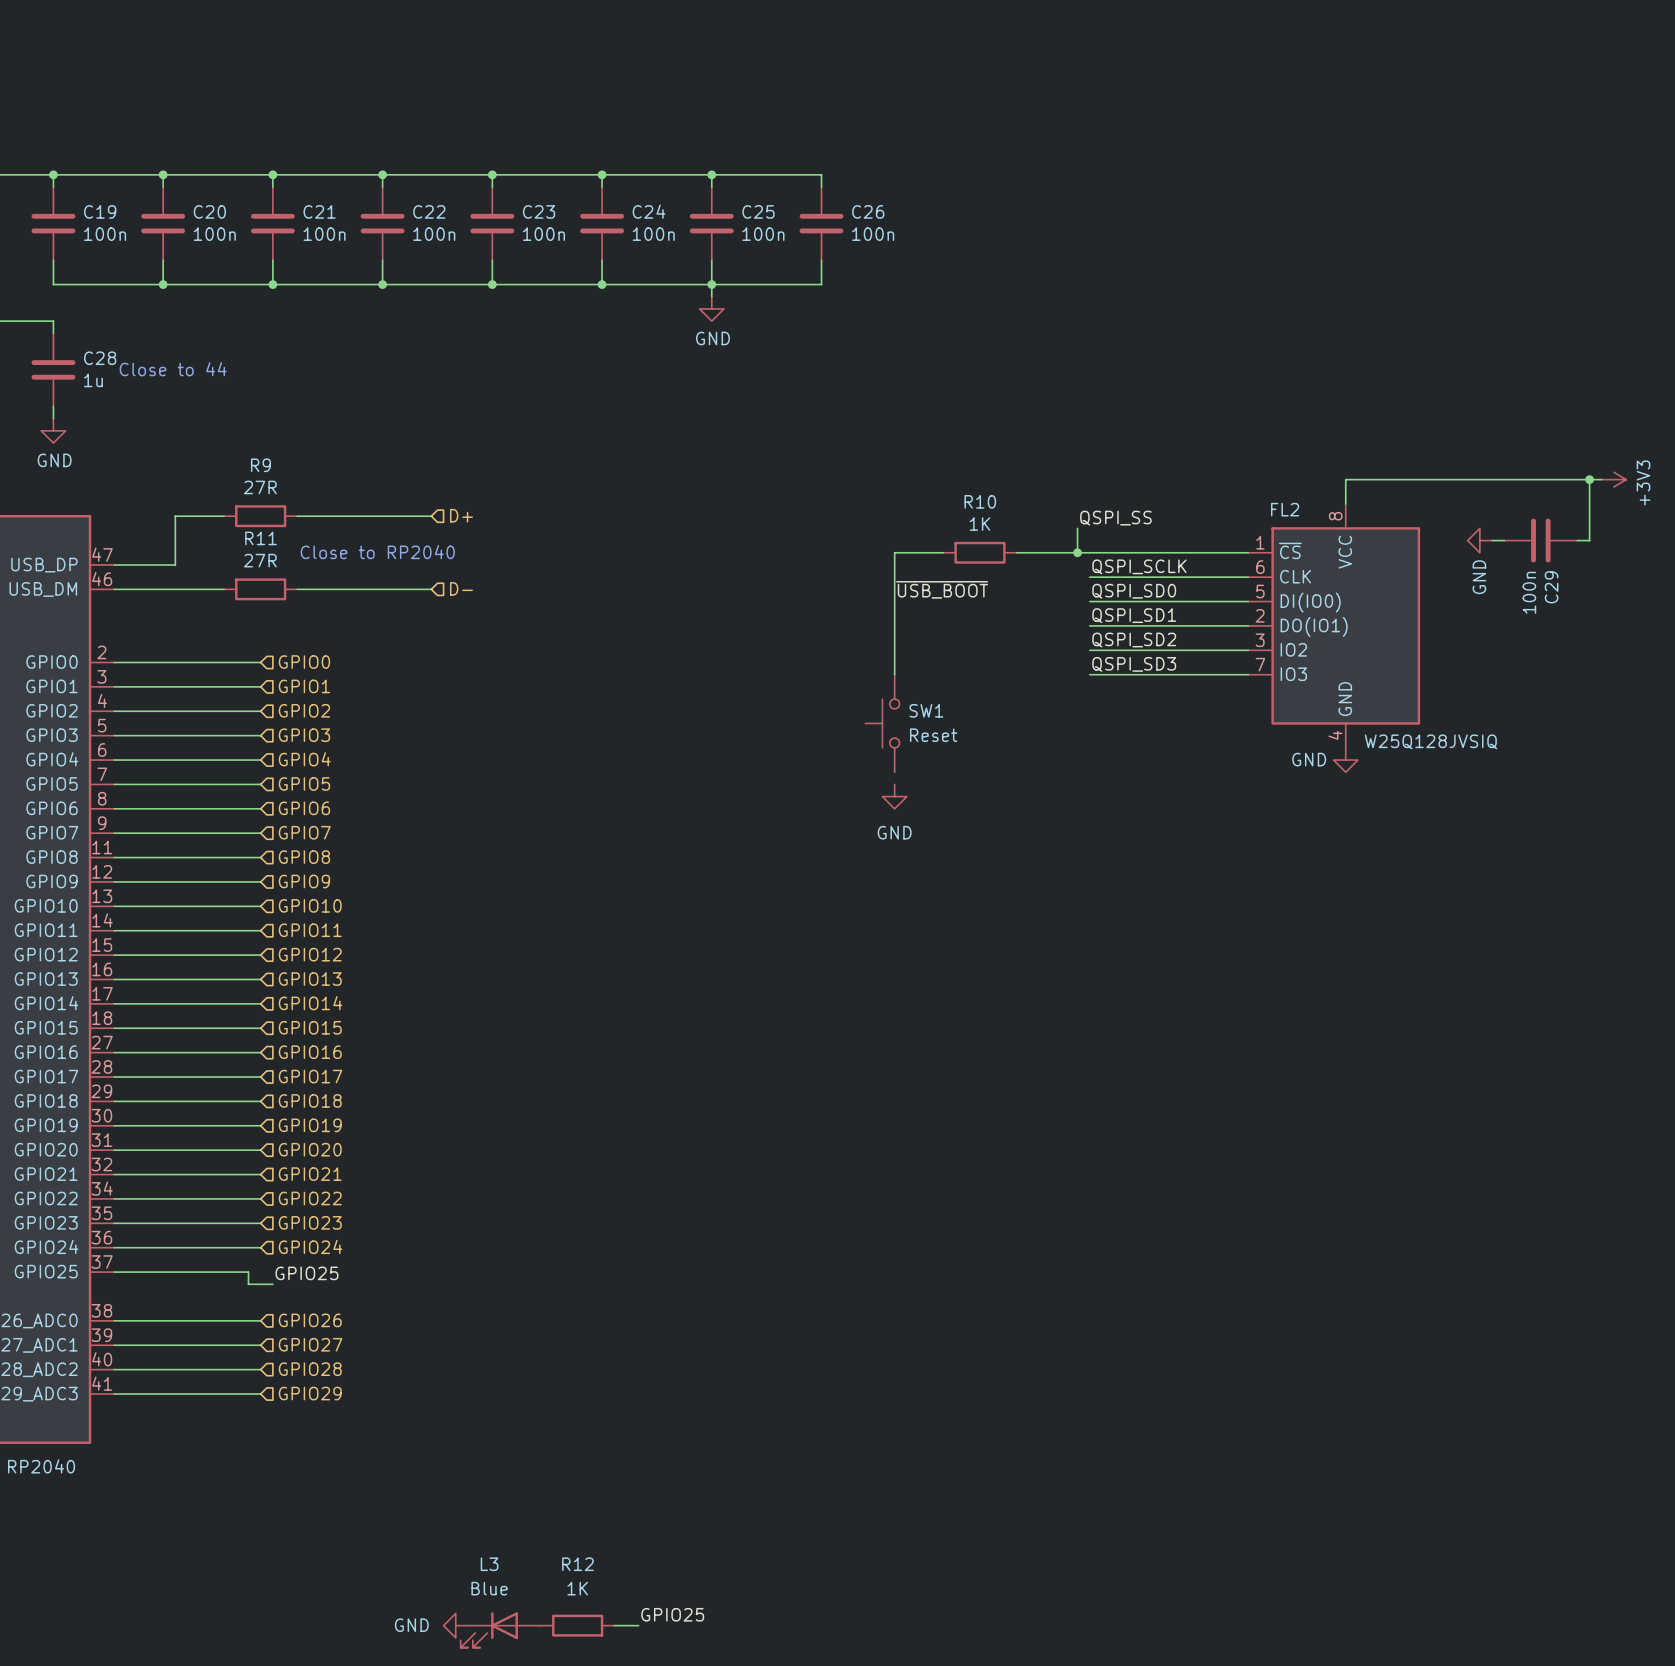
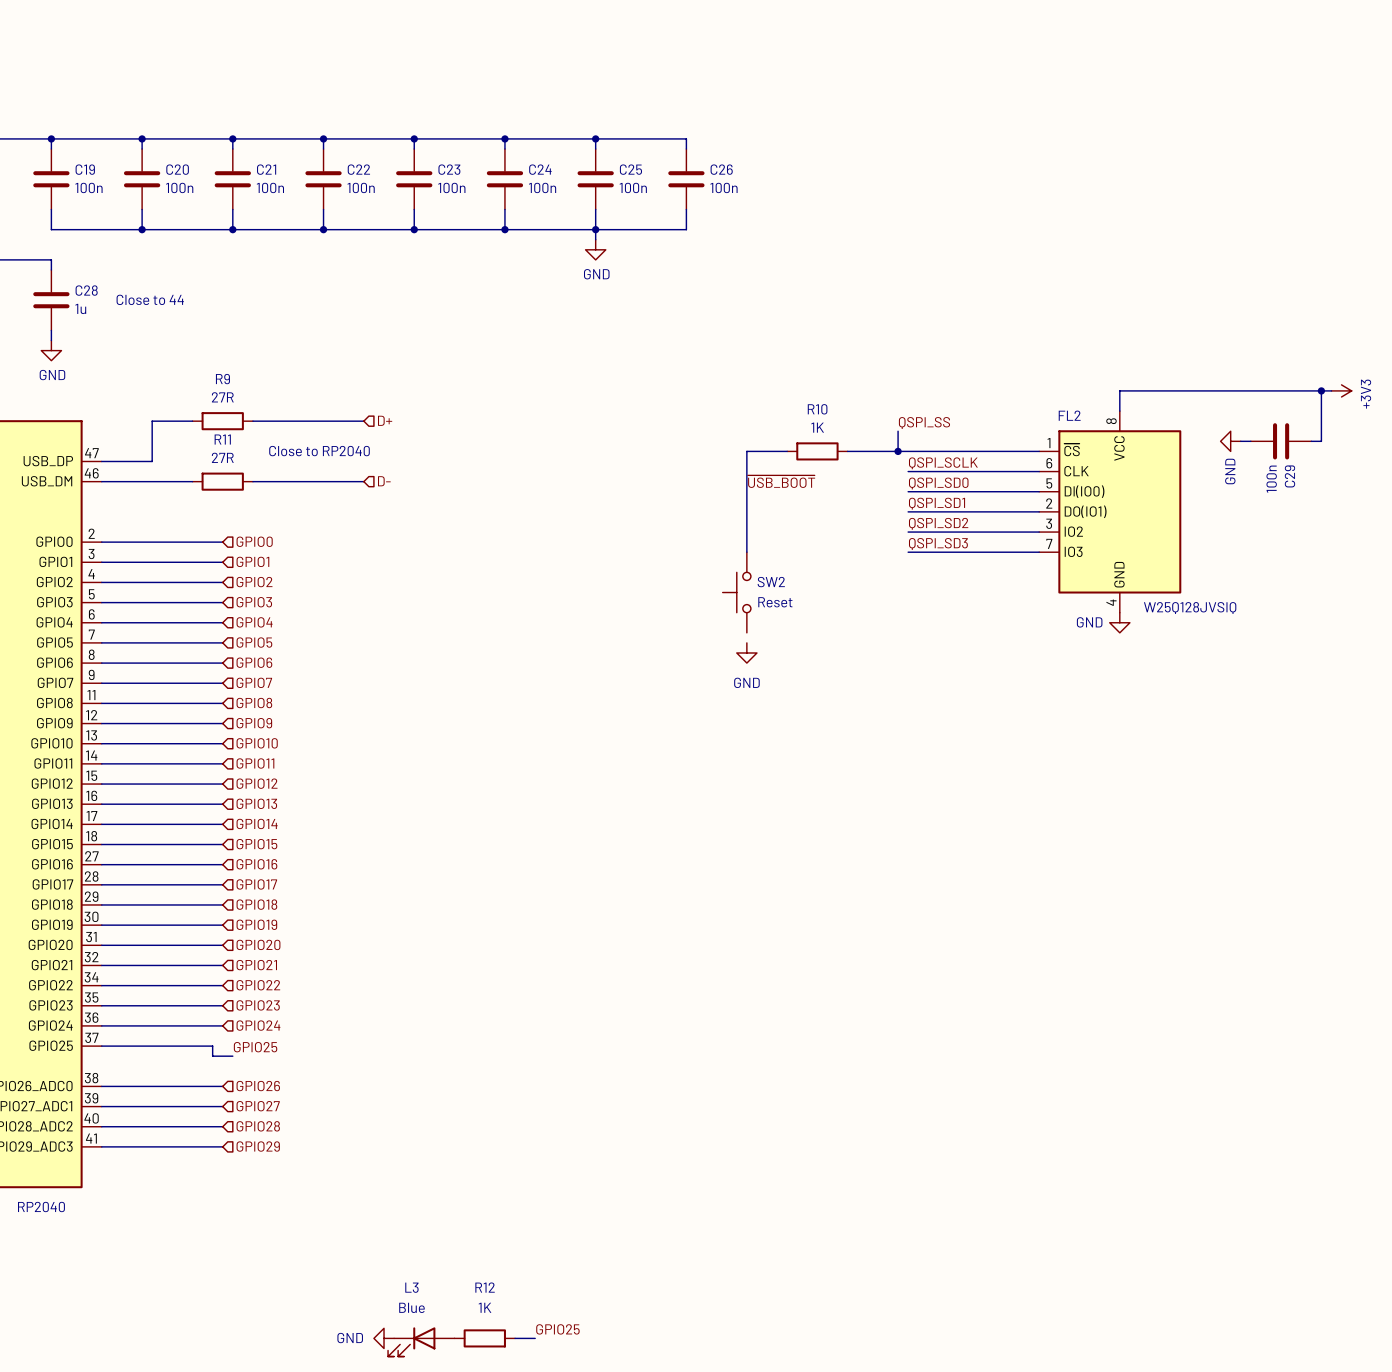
SW1 name: SW1 (926, 710) -> SW2 (771, 582)

